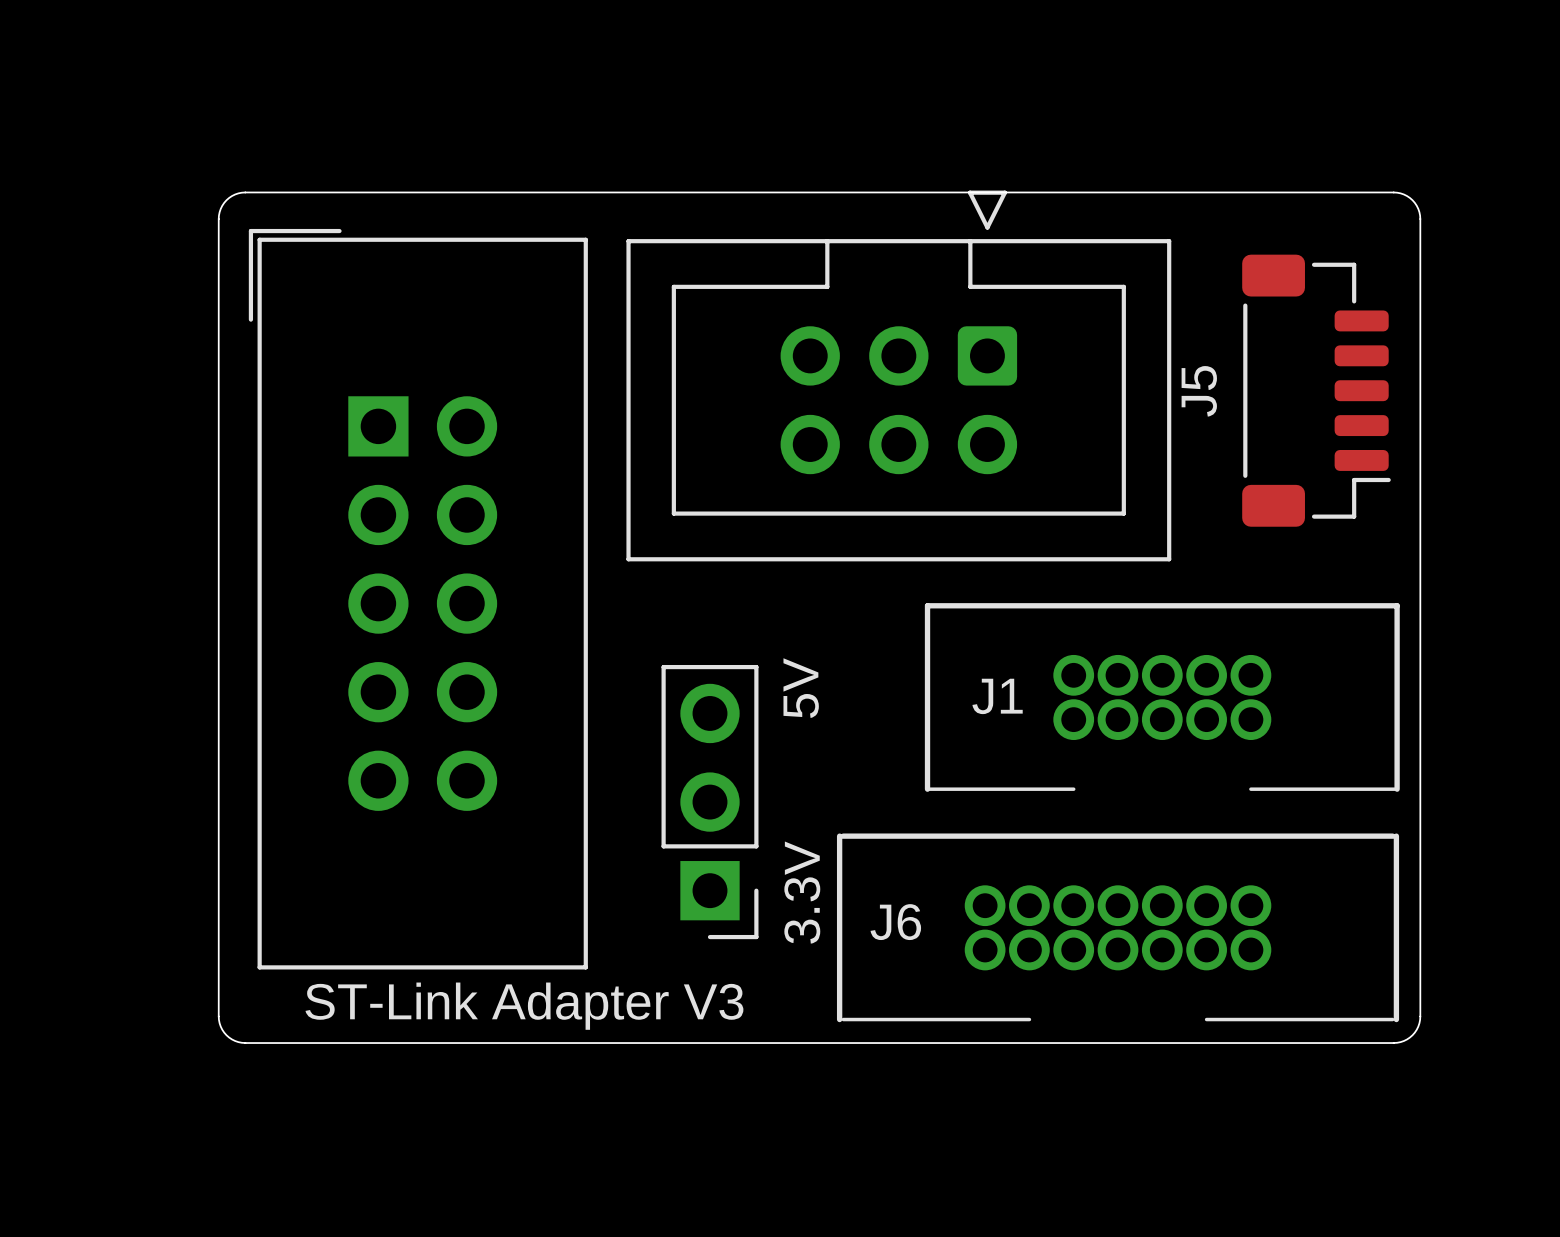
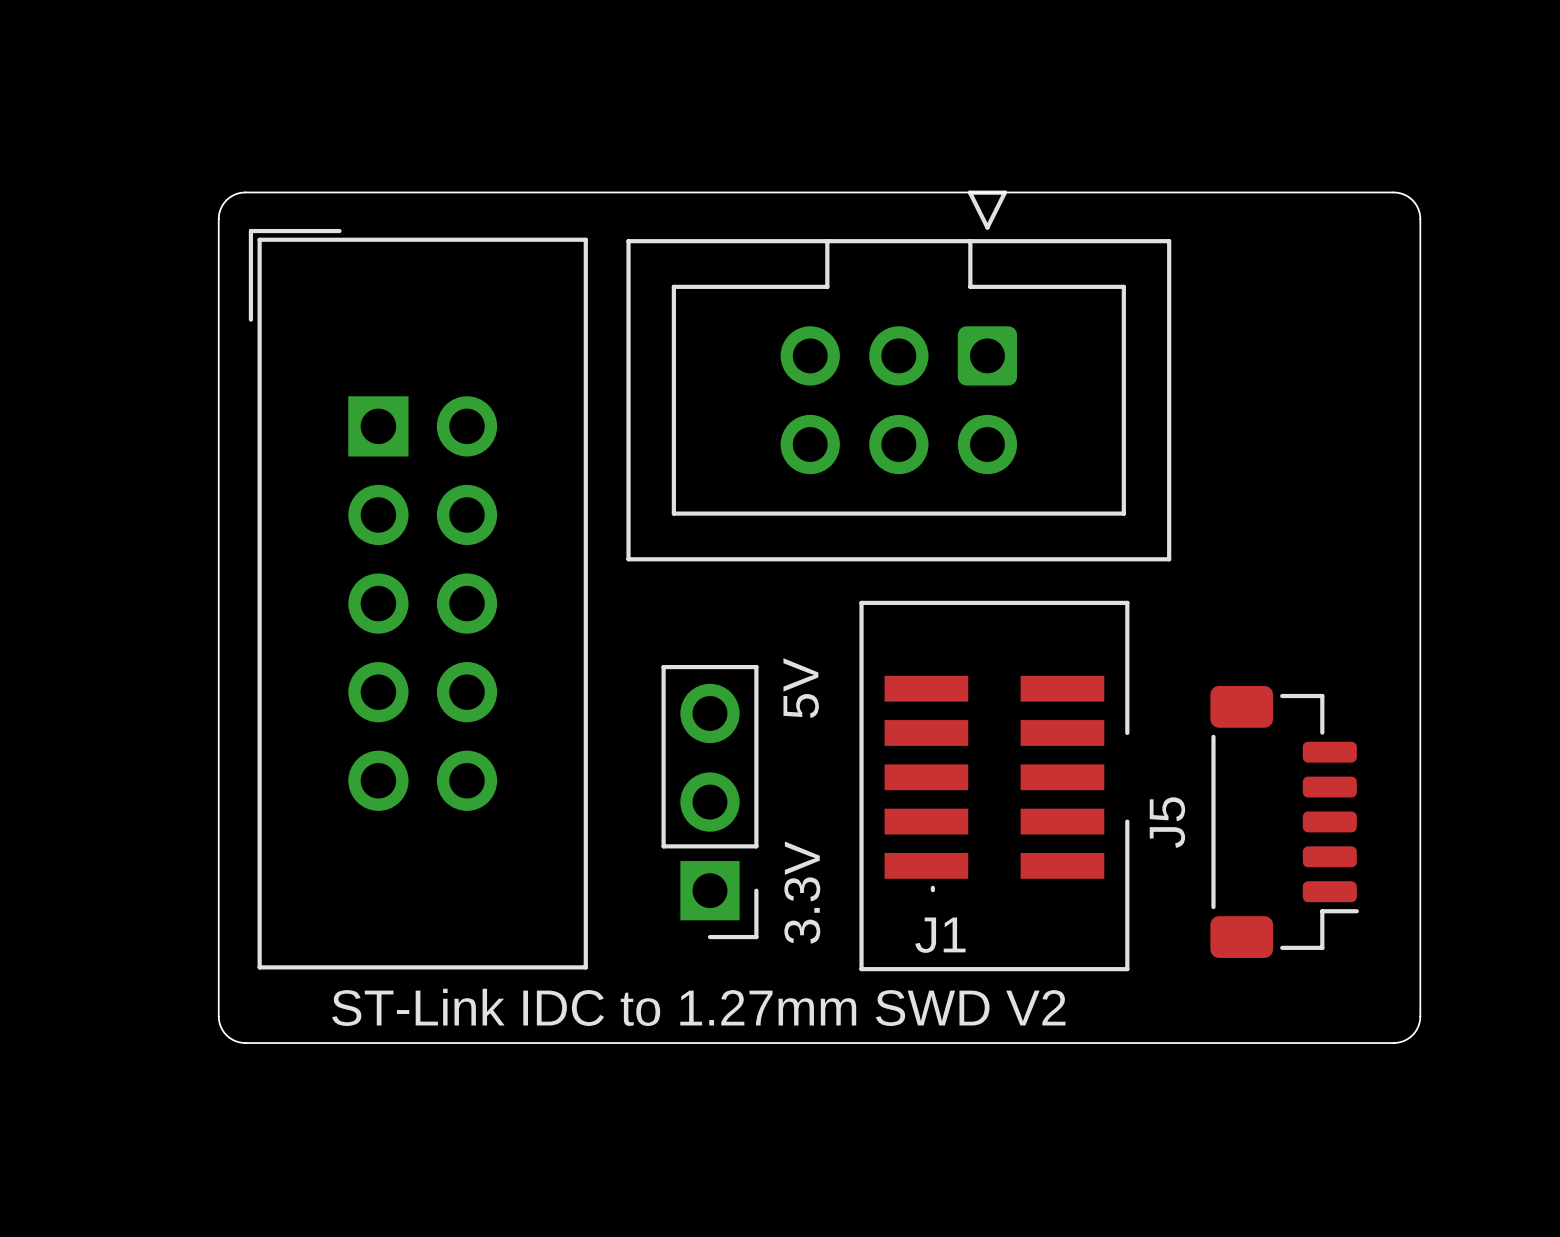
J5 position: (1316, 390) -> (1284, 821)
J1 footprint: [924, 603, 1400, 792] -> [859, 600, 1130, 972]
J1 name position: J1 (997, 696) -> J1 (940, 935)
J6: (1118, 927) -> none
text: ST-Link Adapter V3 (524, 1006) -> none
text: none -> ST-Link IDC to 1.27mm SWD V2 (698, 1007)

